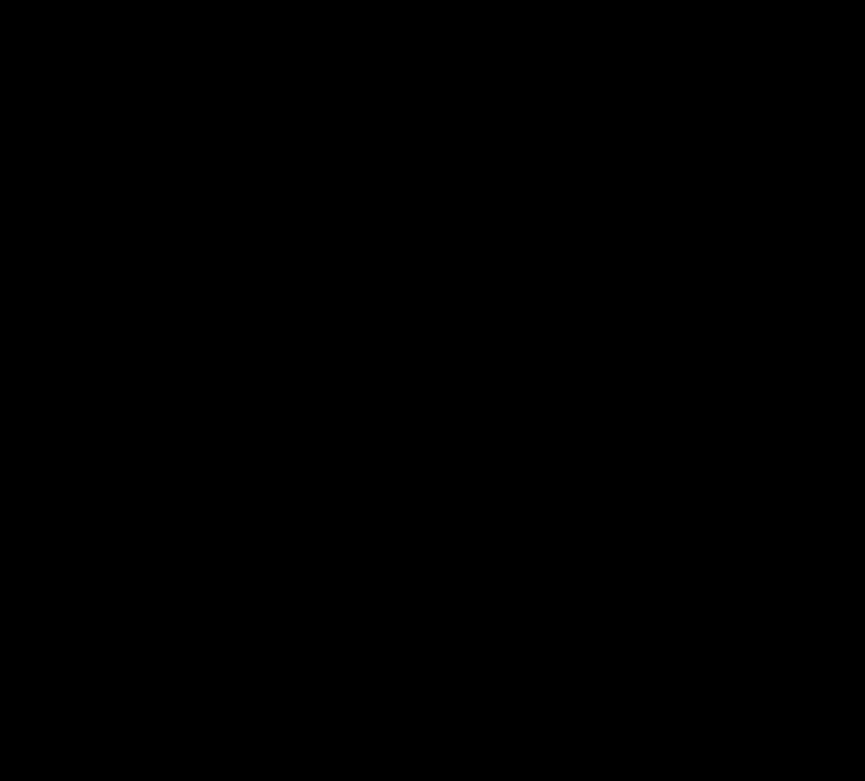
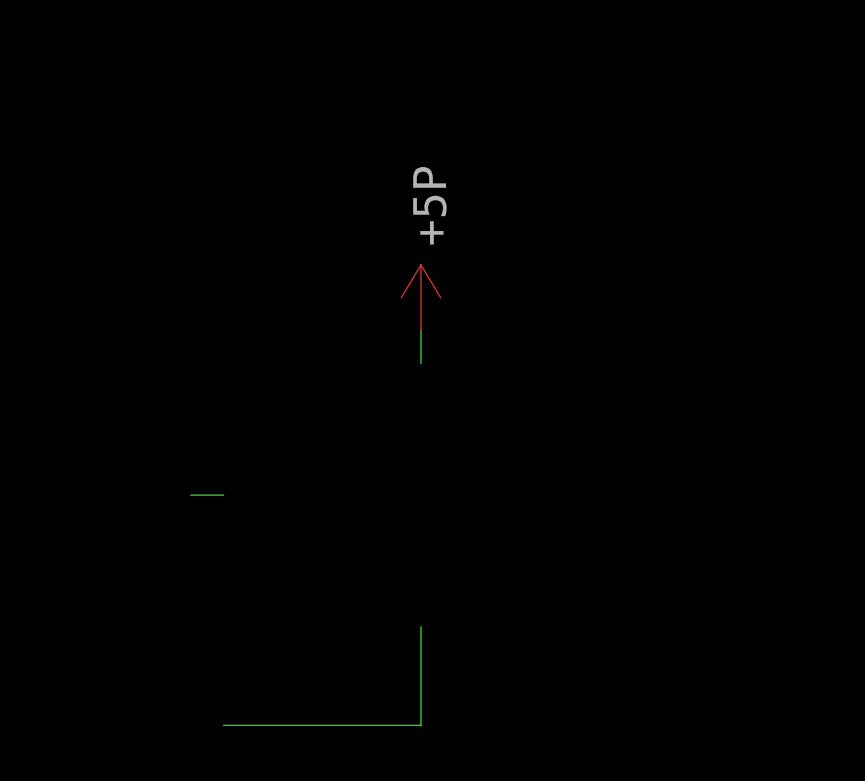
power symbol: none -> +5P (420, 297)
wire: none -> (420, 330) (420, 363)
wire: none -> (190, 495) (223, 495)
wire: none -> (420, 626) (420, 725) (223, 725)

